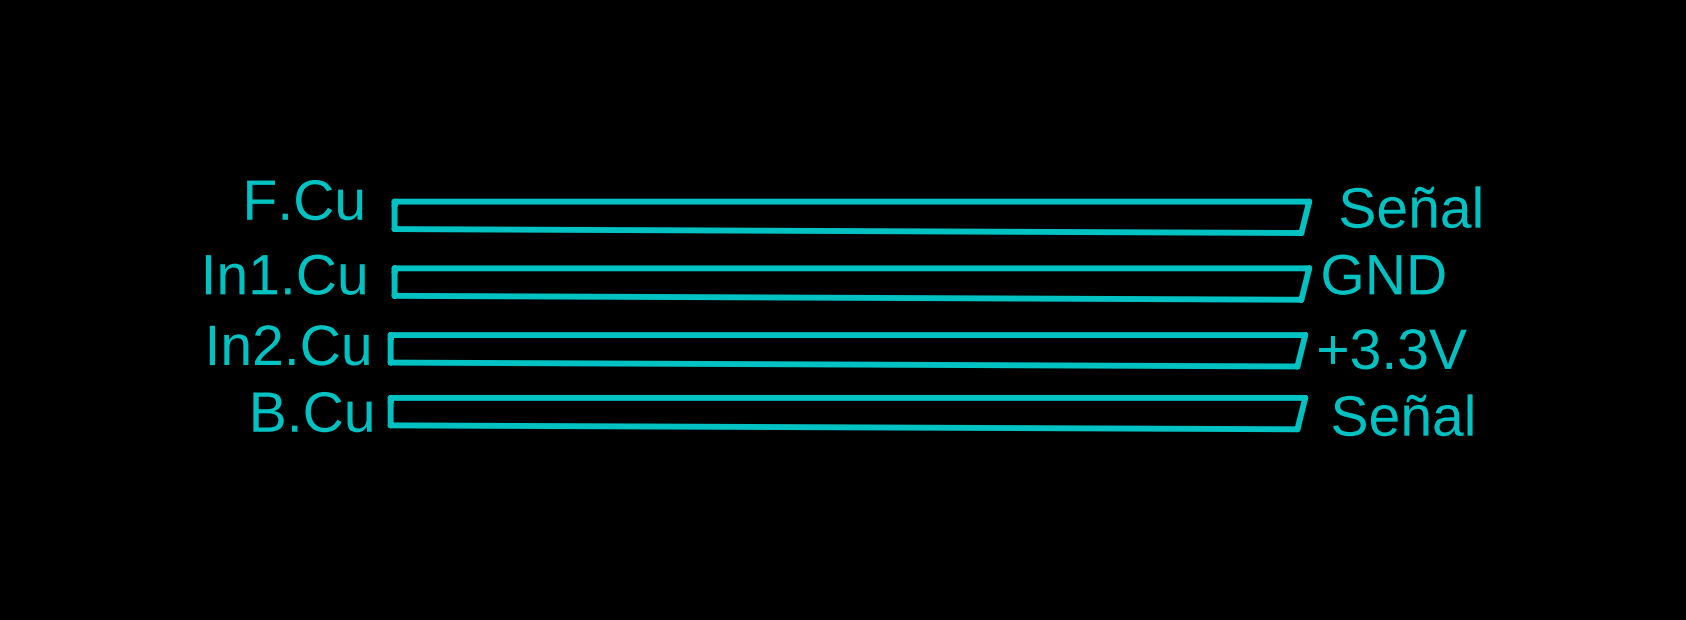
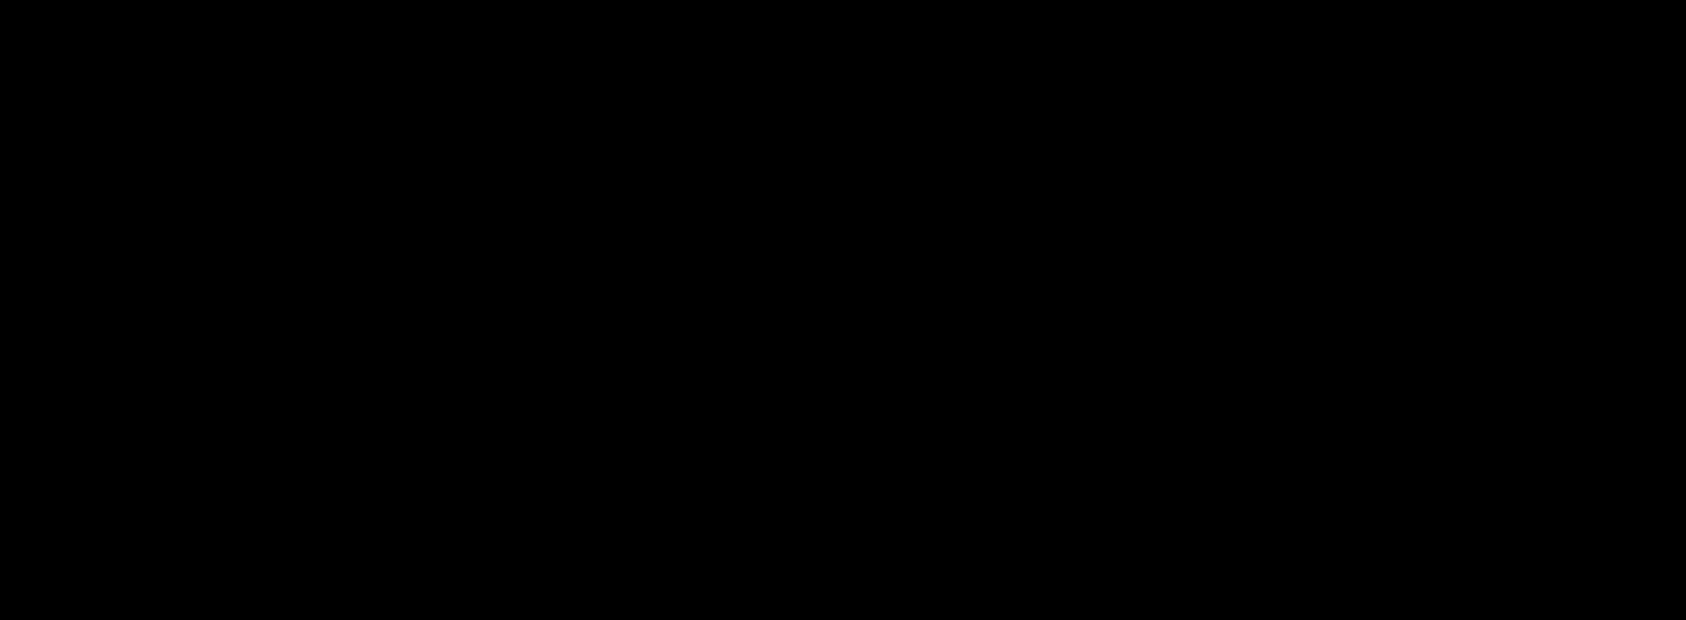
text: F.Cu (304, 200) -> none
line: (394, 201) (394, 229) (1301, 233) (1309, 201) (394, 201) -> none
text: Señal (1410, 207) -> none
line: (394, 268) (1309, 268) (1301, 299) (394, 295) (394, 268) -> none
text: In1.Cu (285, 274) -> none
text: GND (1383, 274) -> none
line: (390, 335) (390, 362) (1297, 366) (1305, 335) (390, 335) -> none
text: In2.Cu (289, 345) -> none
text: +3.3V (1392, 349) -> none
line: (390, 397) (1305, 397) (1297, 429) (390, 425) (390, 397) -> none
text: B.Cu (312, 412) -> none
text: Señal (1402, 415) -> none

